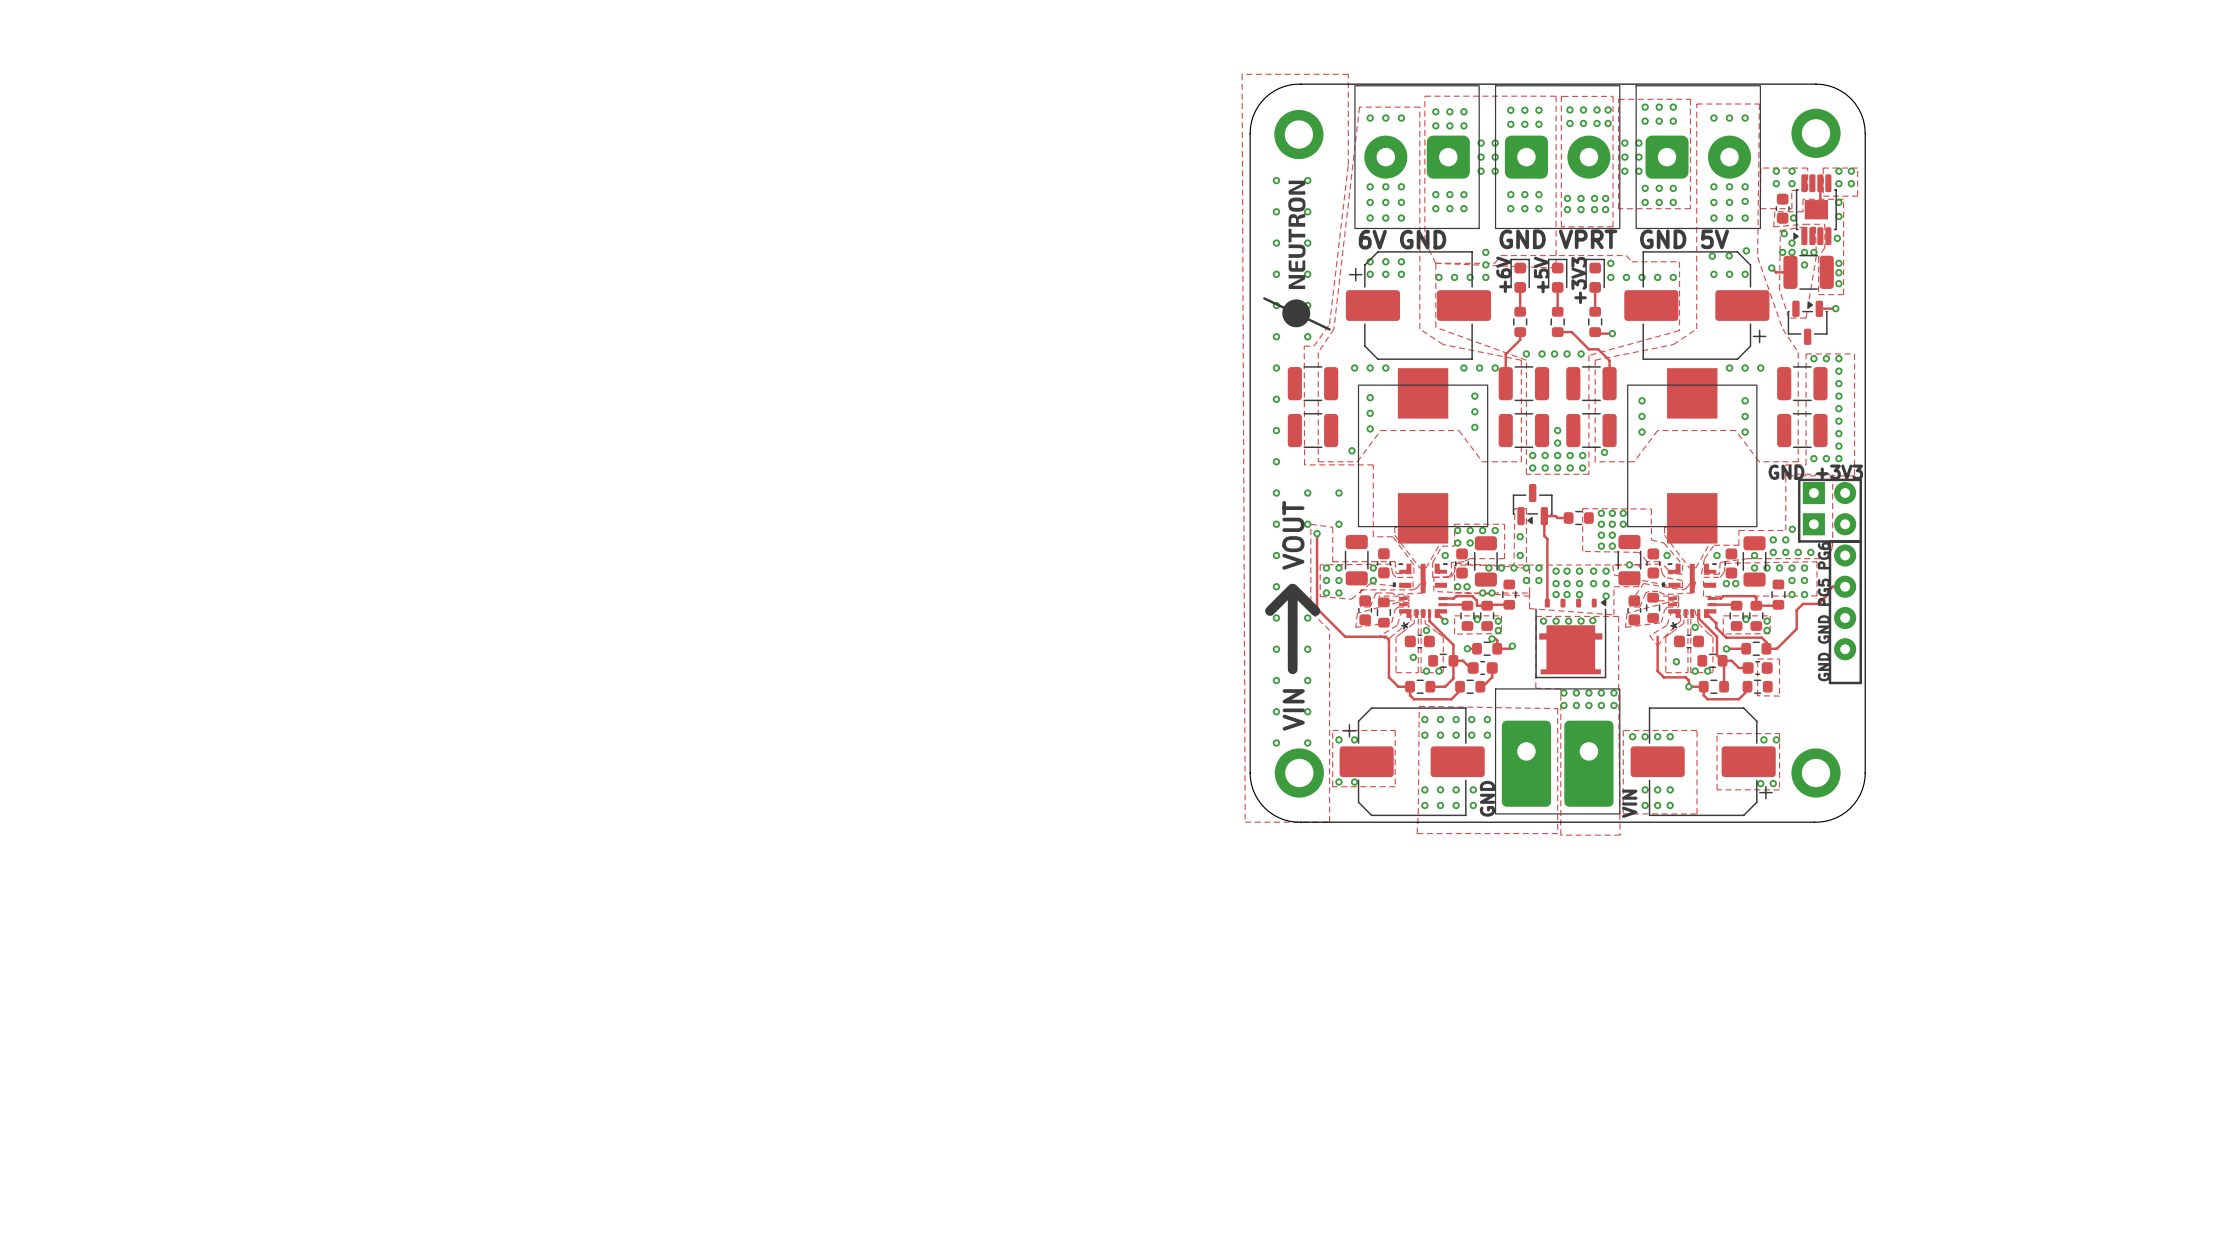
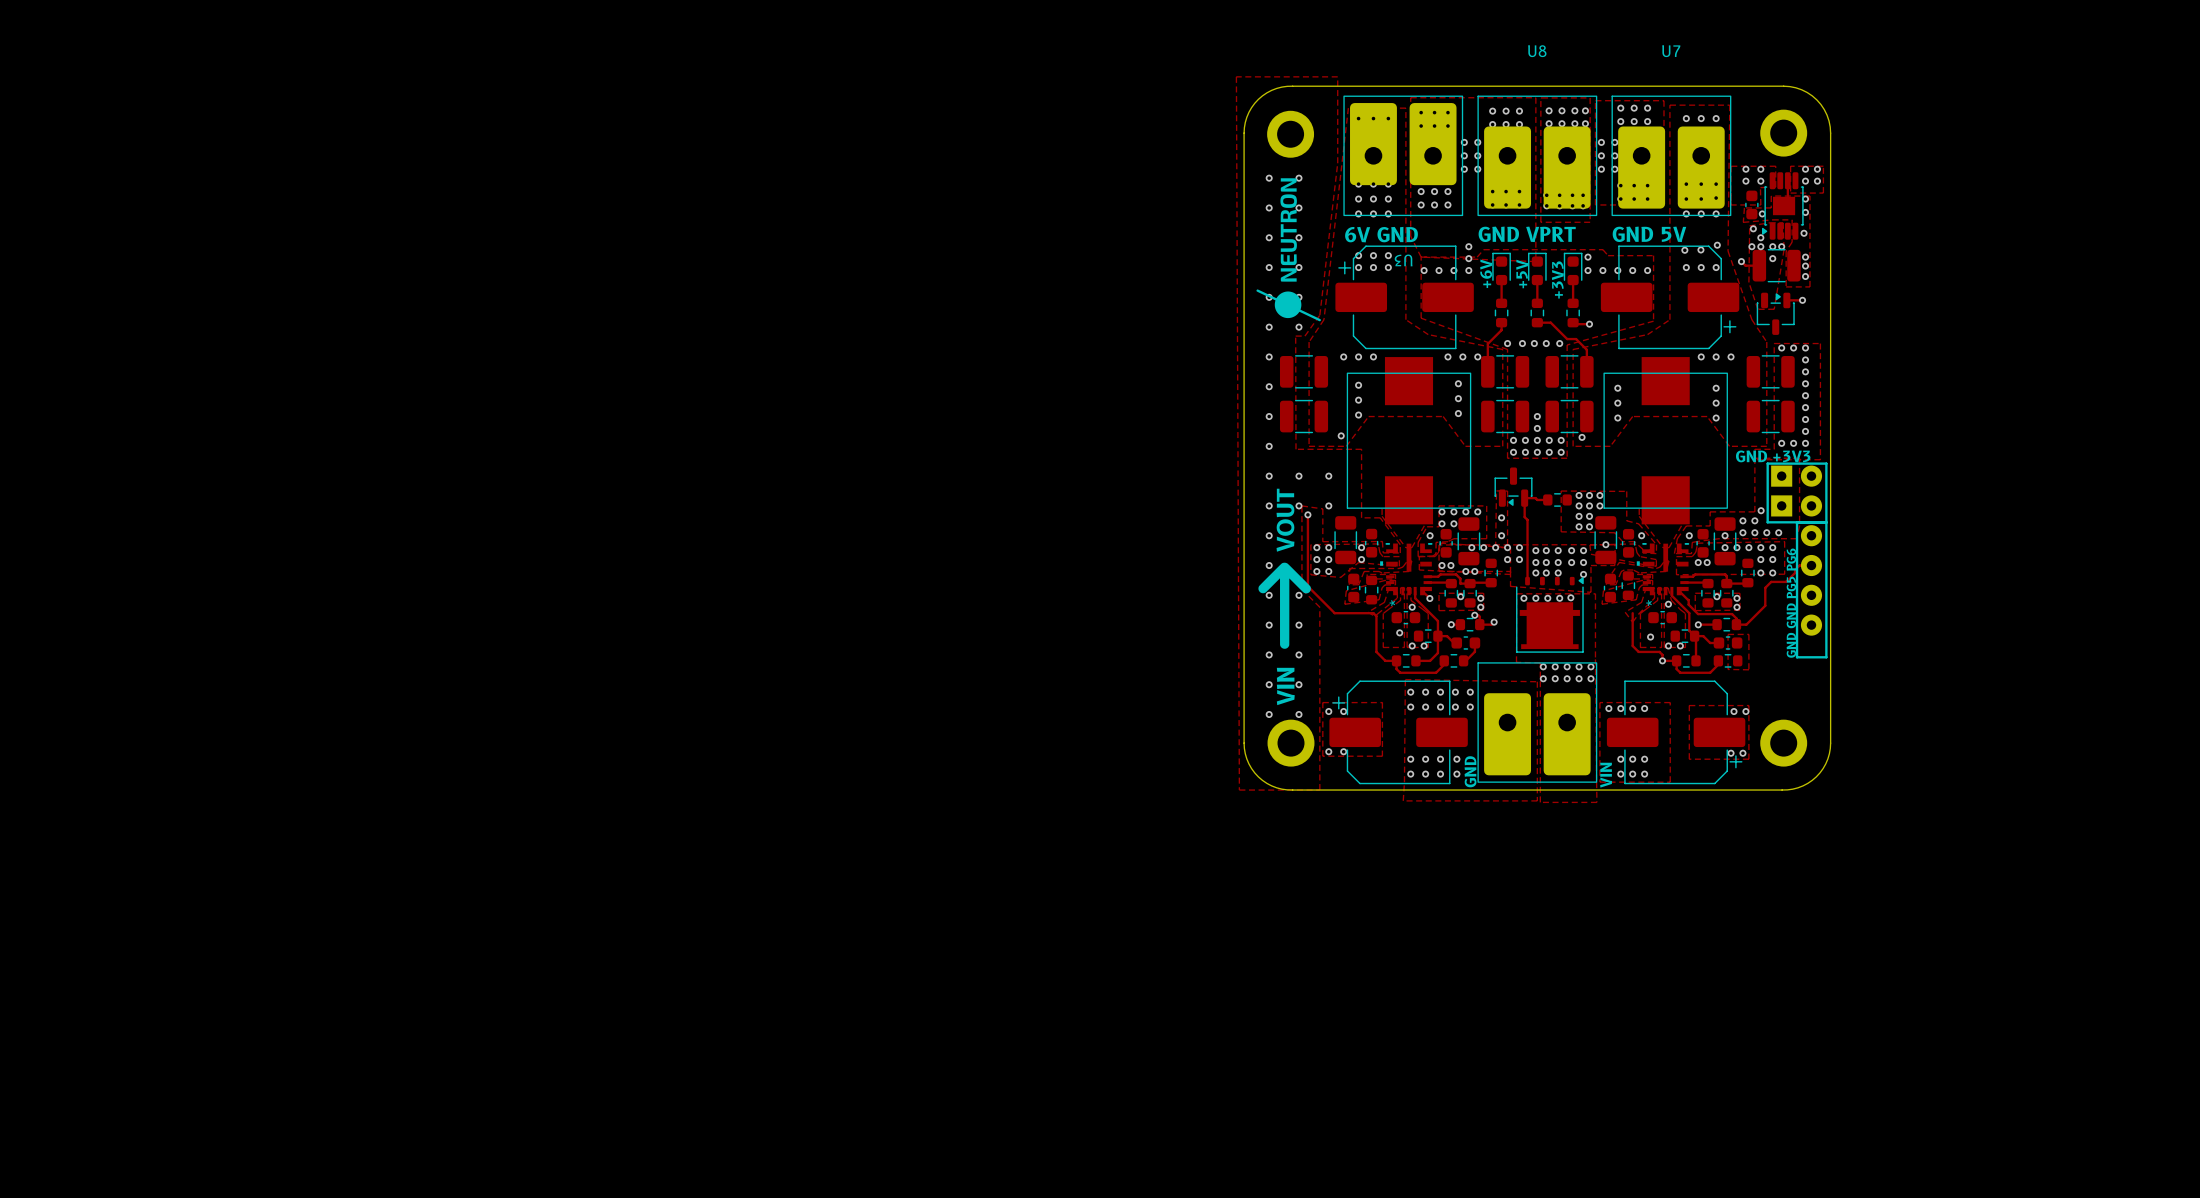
part: (1417, 157) -> none
U3: none -> (1403, 155)
part: (1557, 157) -> none
U8: none -> (1537, 155)
part: (1698, 157) -> none
U7: none -> (1671, 155)

